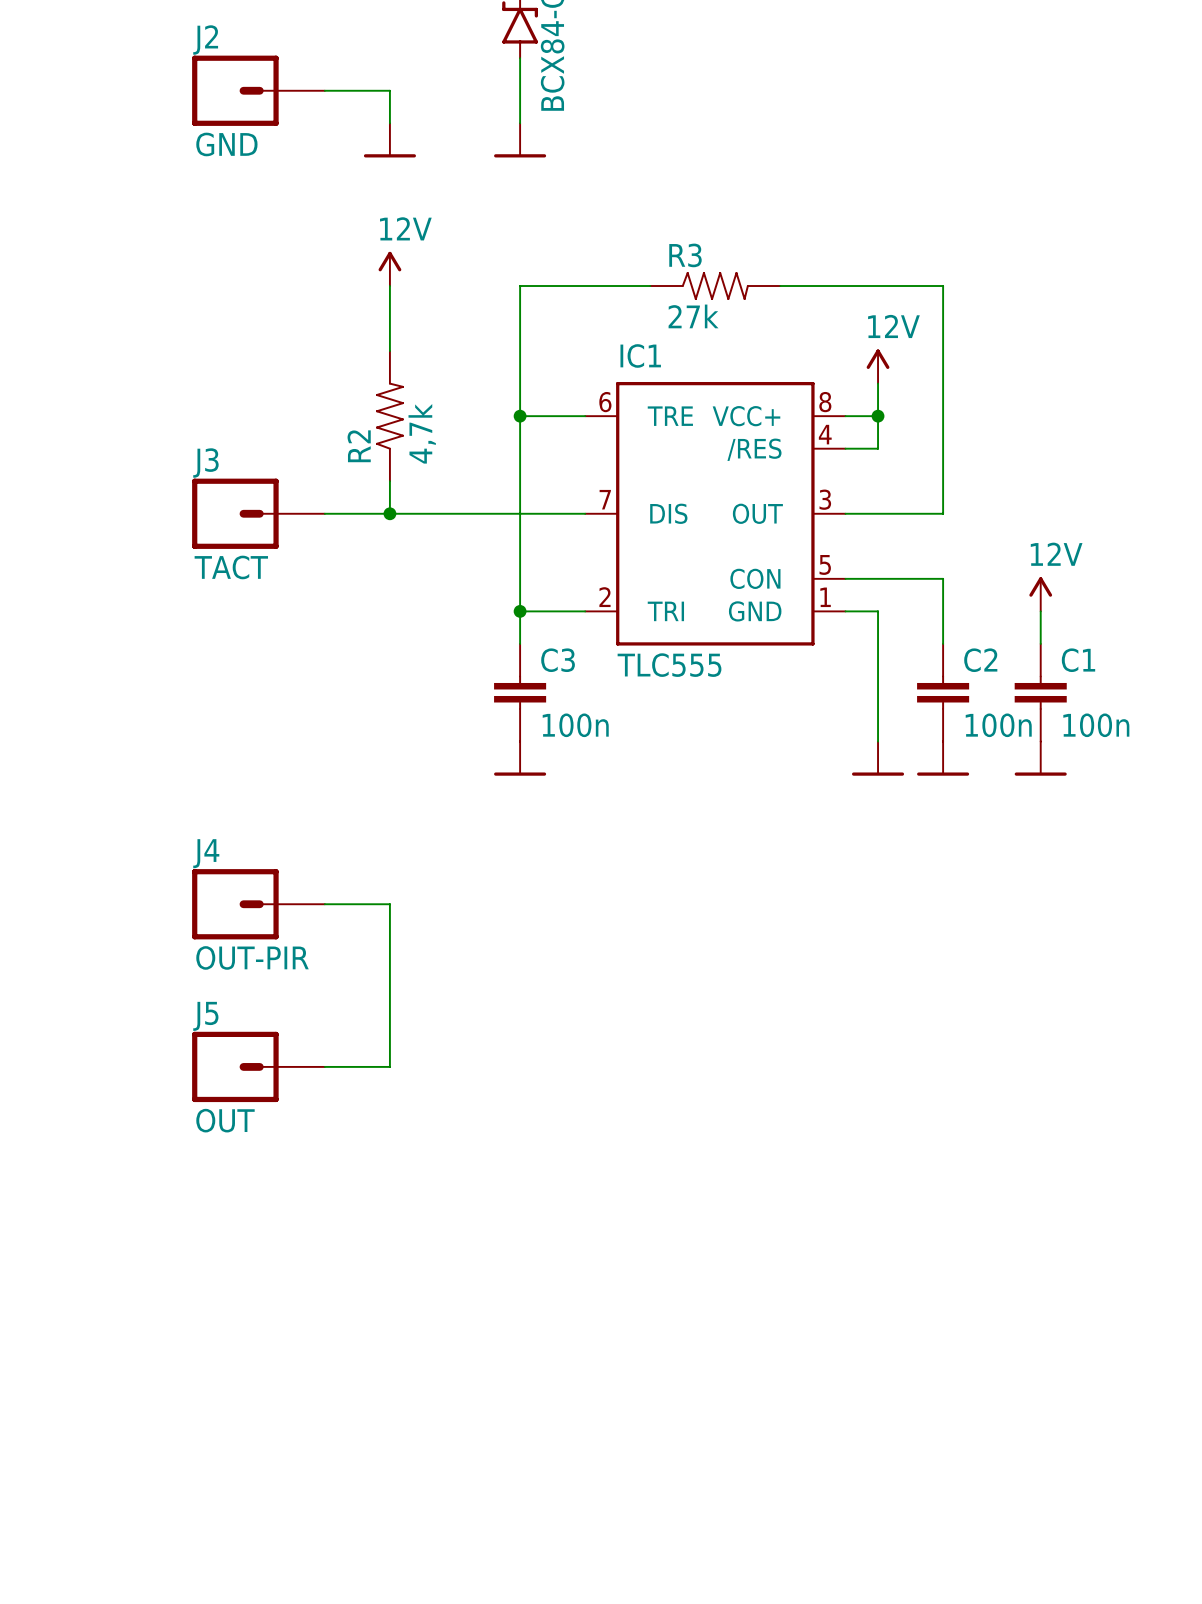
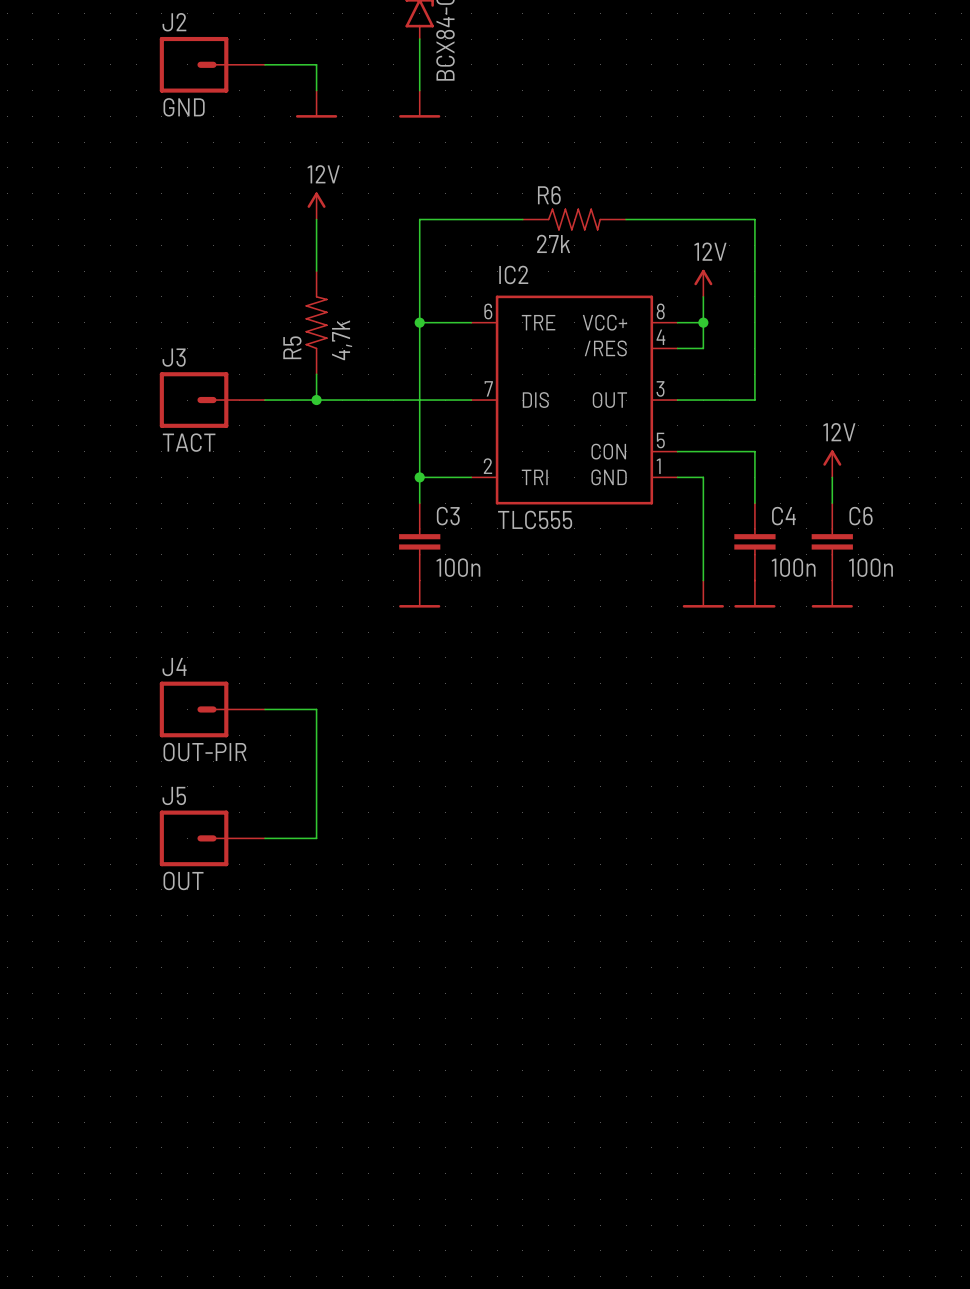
R3 name: R3 (685, 255) -> R6 (549, 195)
IC1 name: IC1 (640, 355) -> IC2 (513, 274)
R2 name: R2 (359, 446) -> R5 (292, 347)
C2 name: C2 (980, 660) -> C4 (783, 516)
C1 name: C1 (1078, 660) -> C6 (861, 516)

